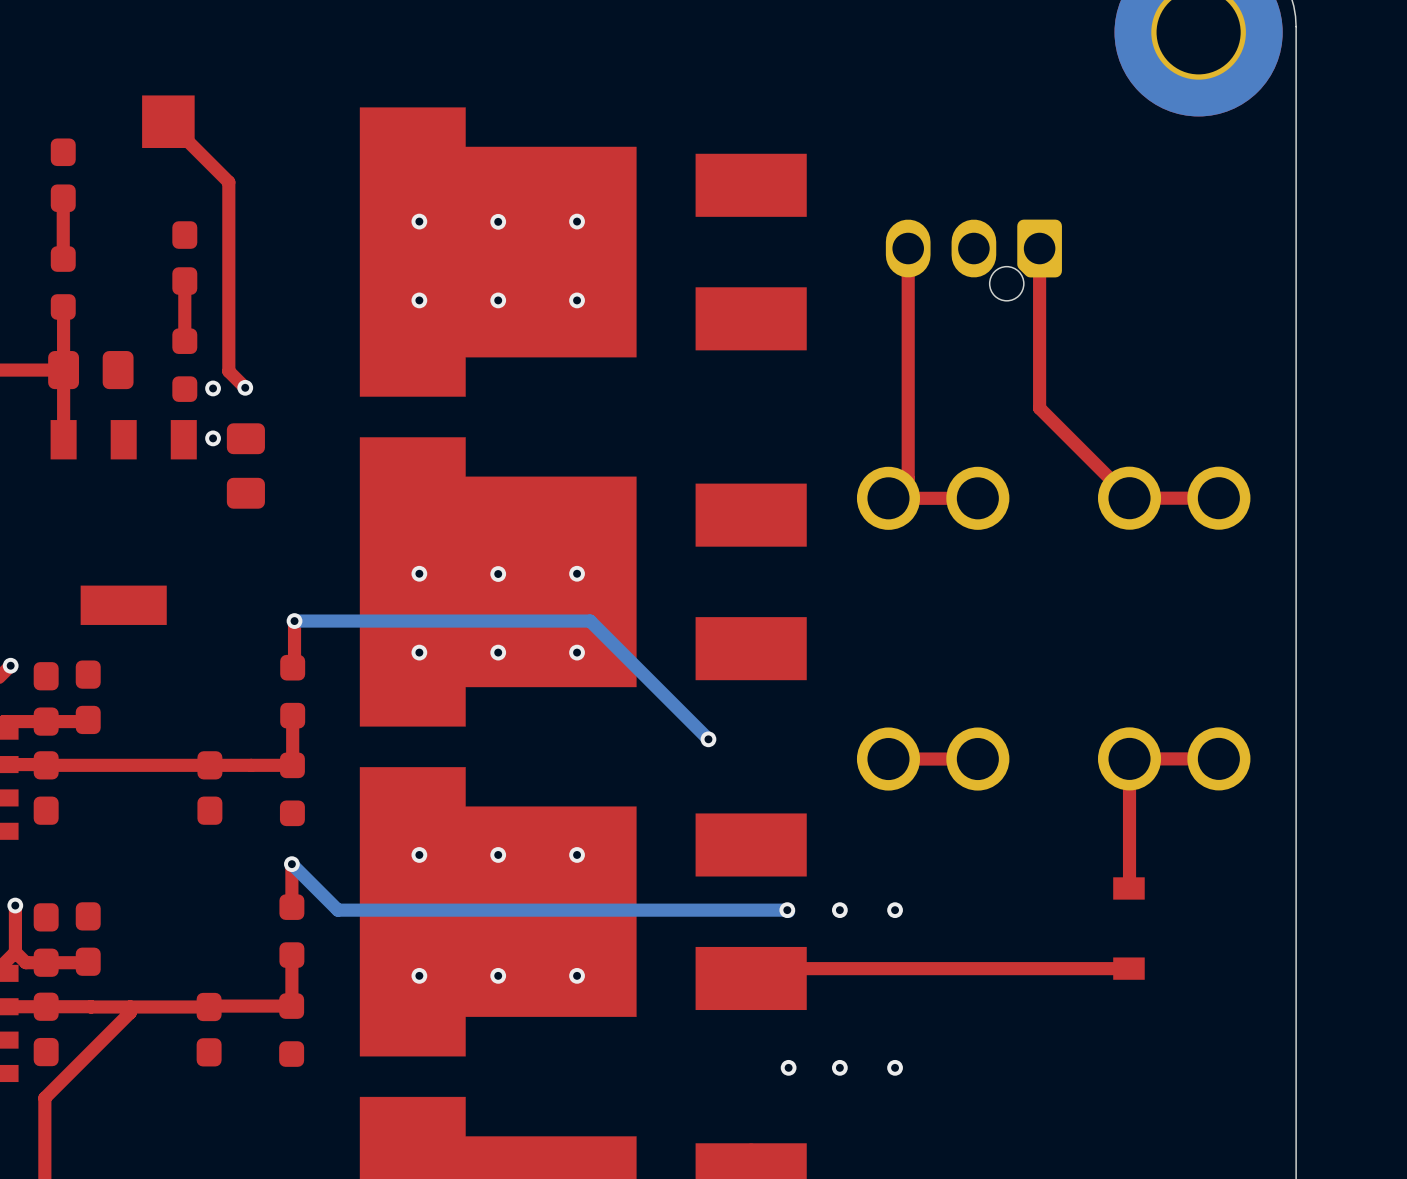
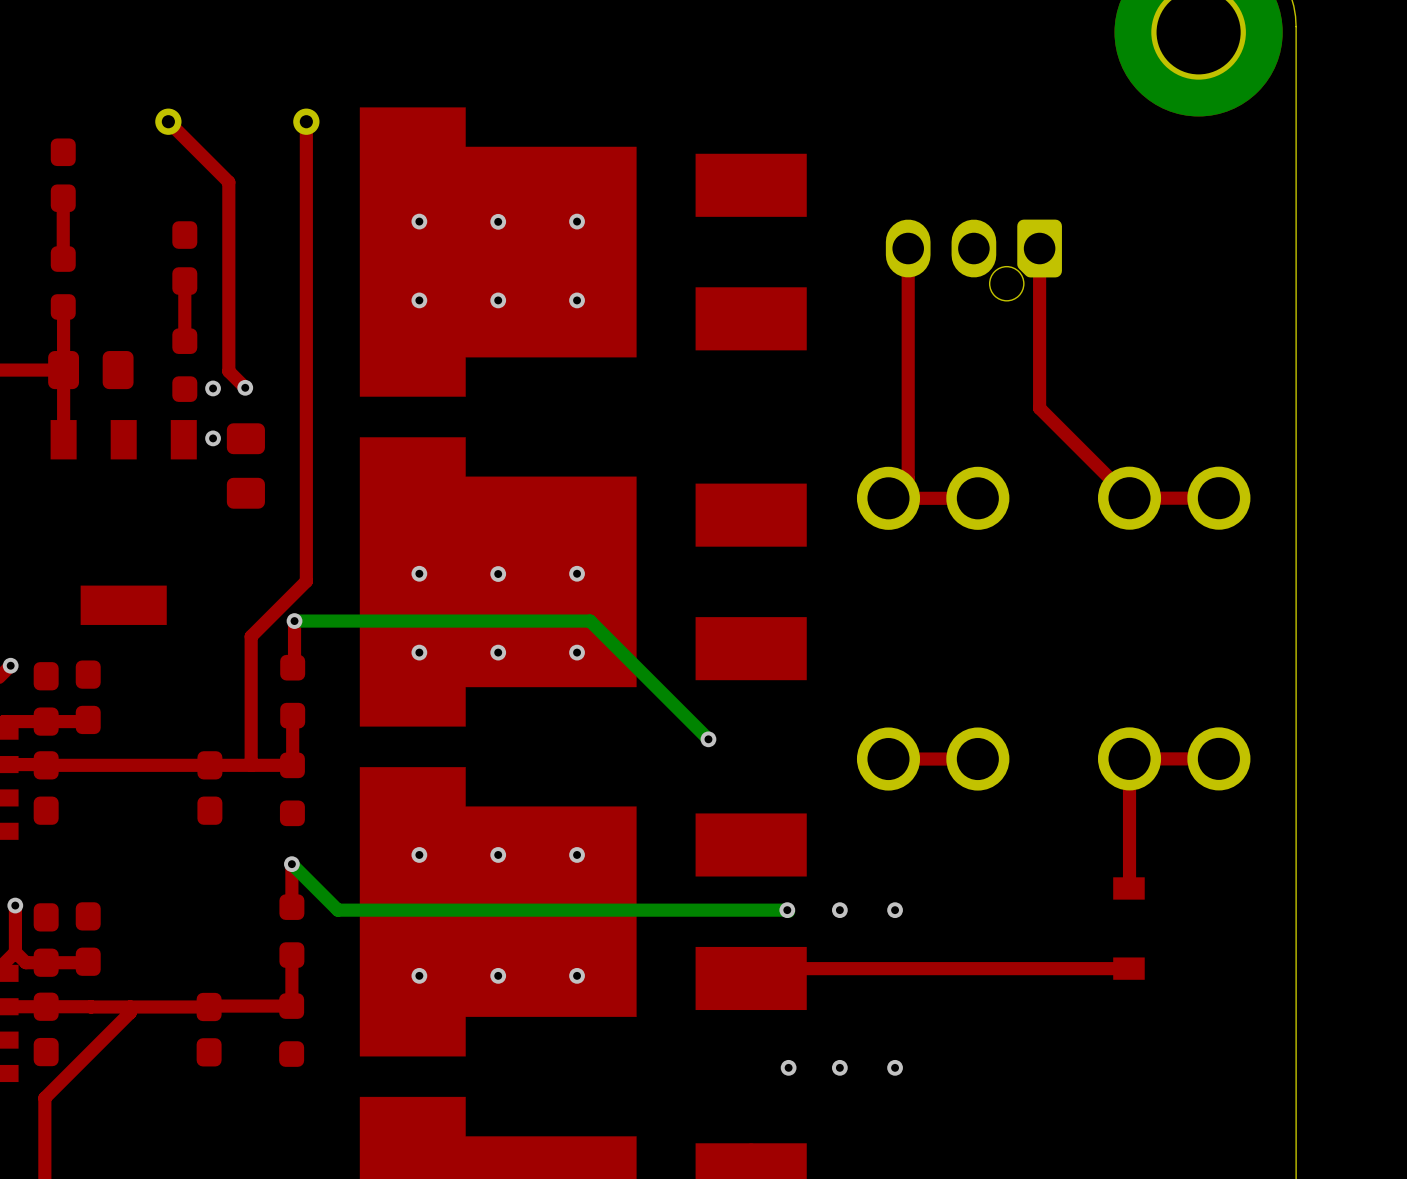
part footprint: [142, 95, 195, 148] -> [155, 108, 182, 135]
top track: none -> (306, 121) (306, 581) (251, 636) (251, 765)
part: none -> (306, 121)

